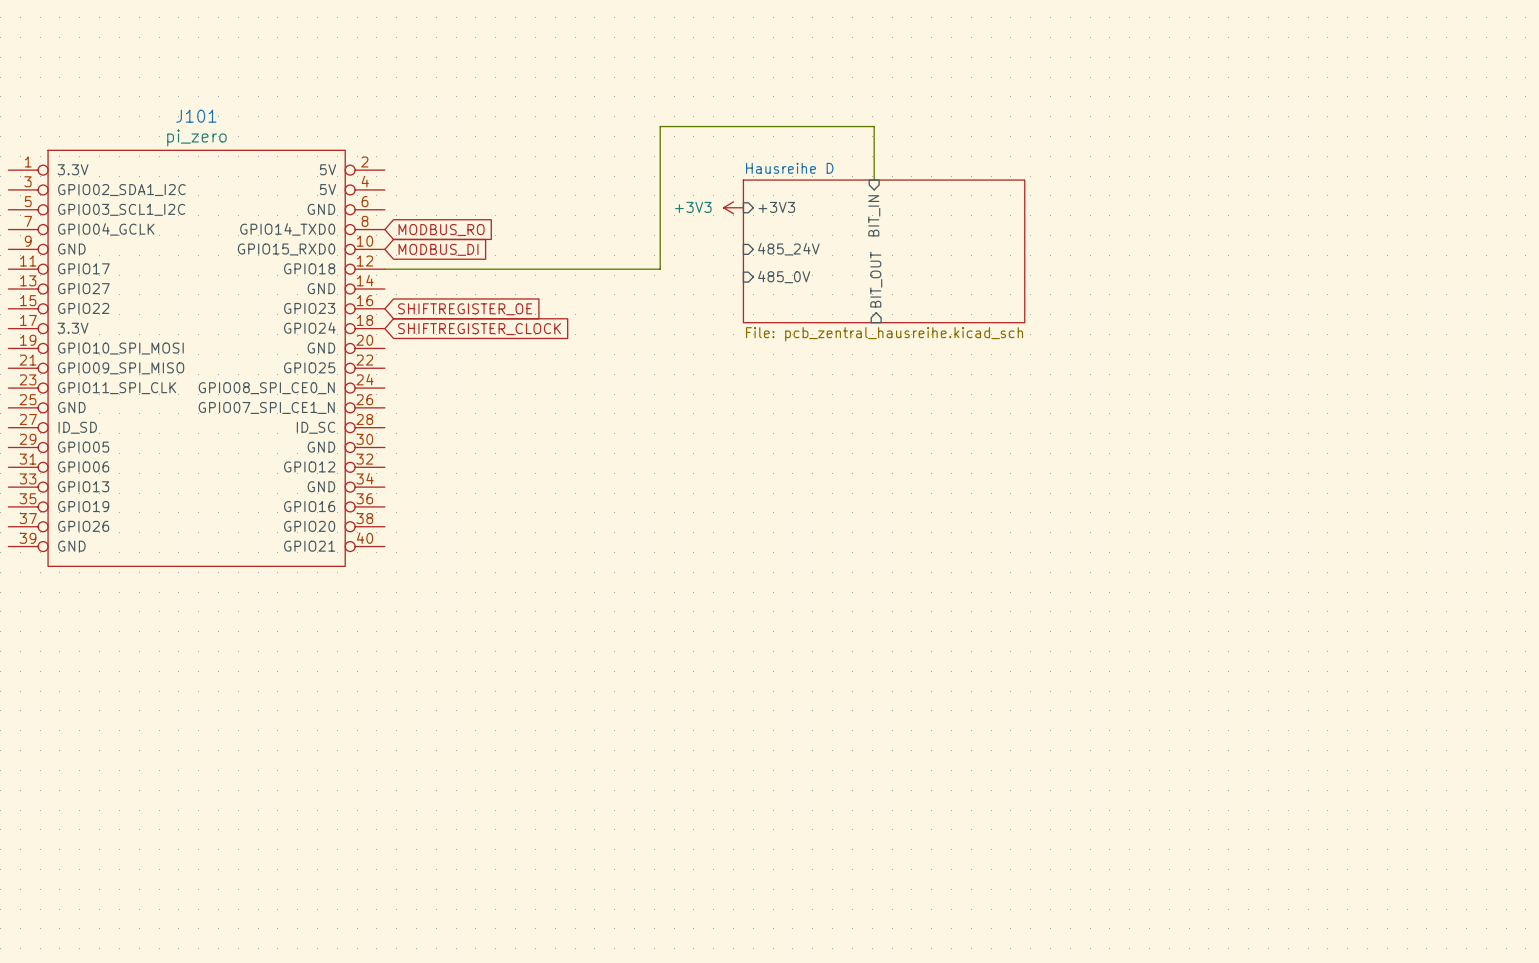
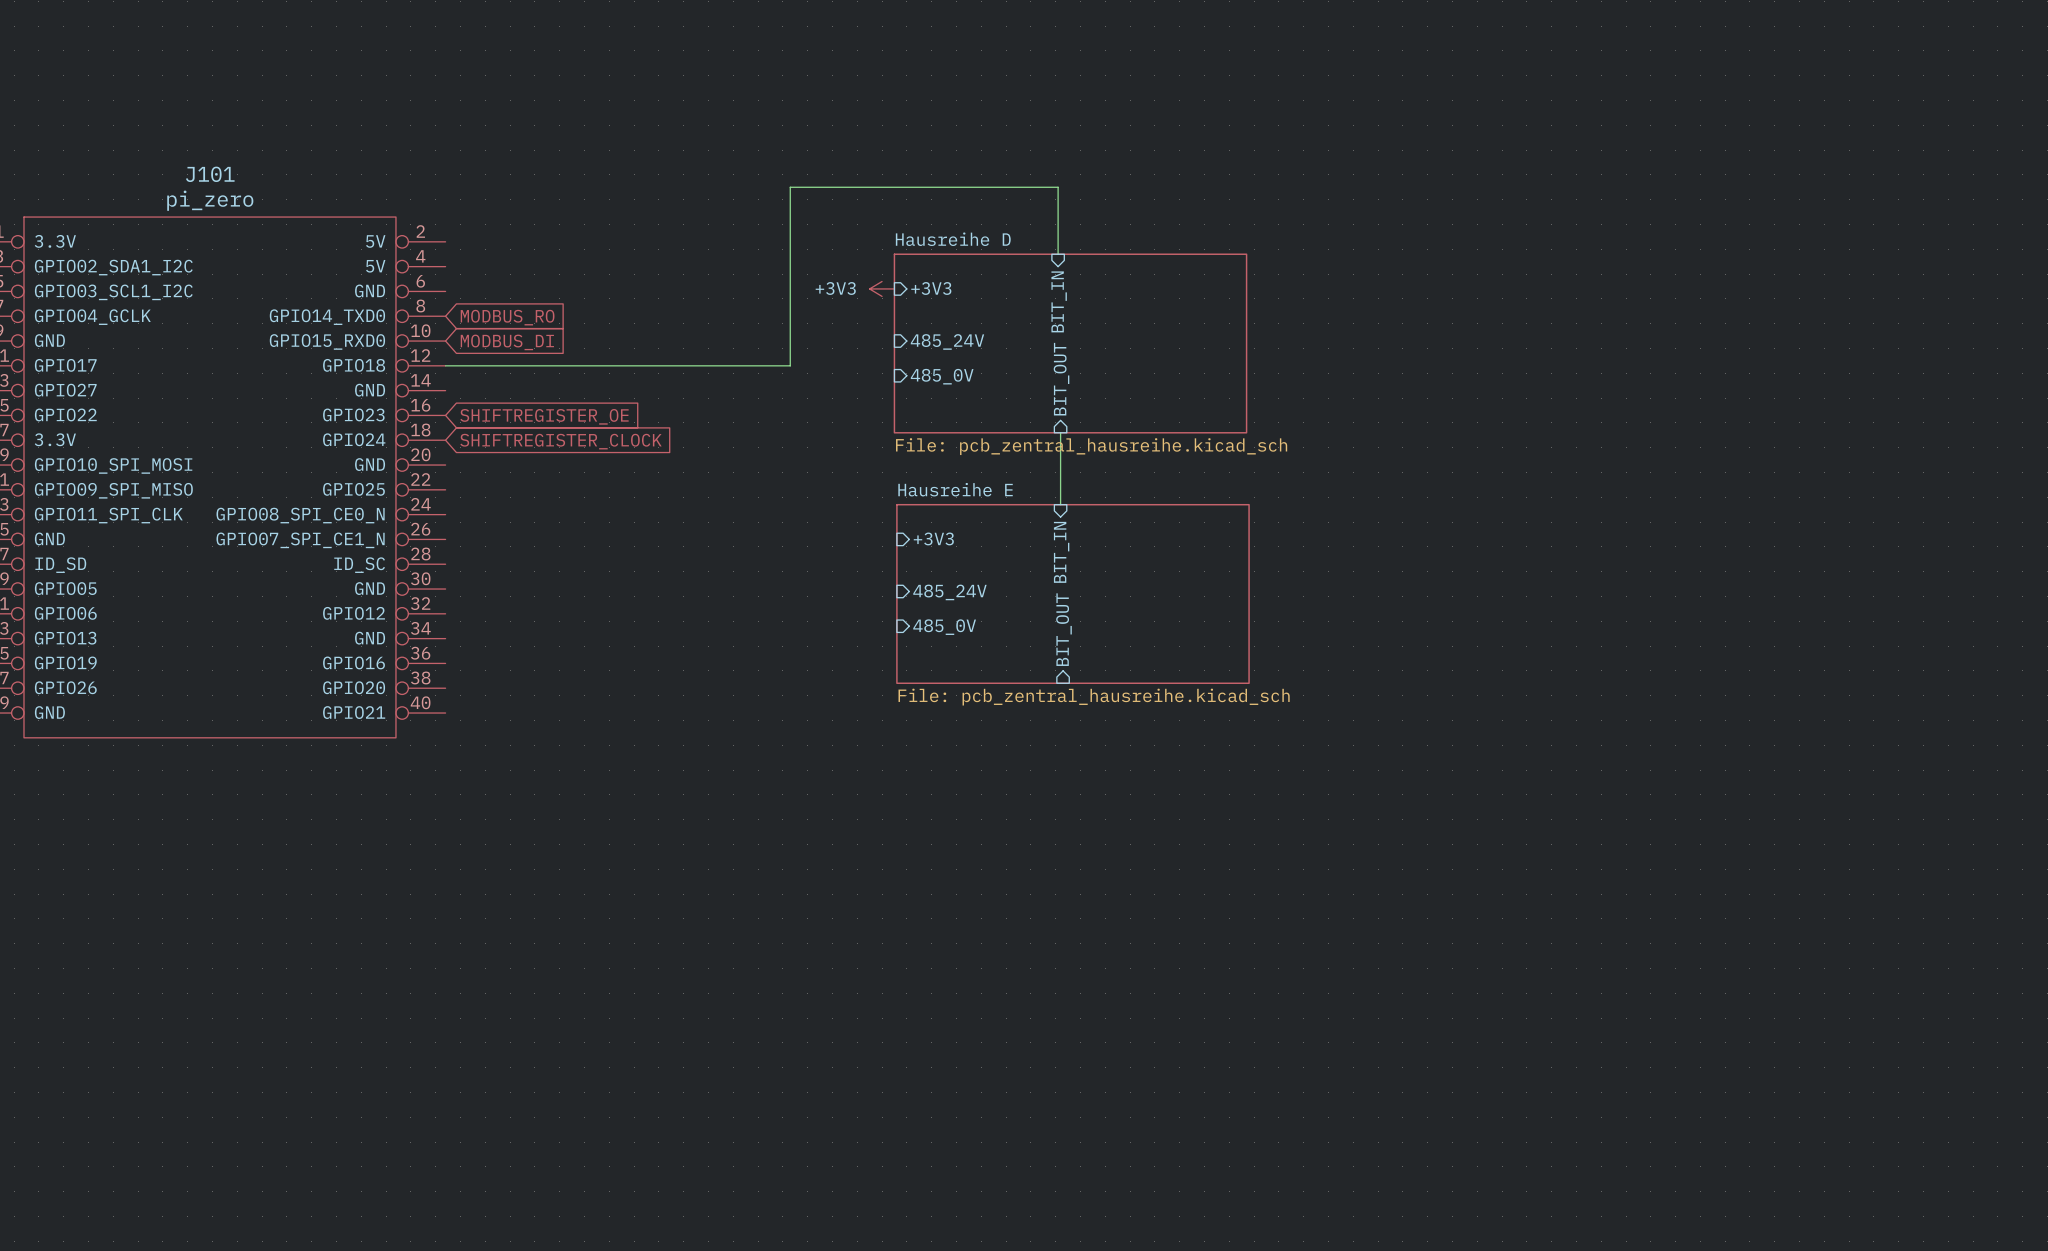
wire: none -> (1060, 432) (1060, 504)
sheet pin: none -> +3V3 (933, 538)
sheet pin: none -> BIT_IN (1061, 552)
sheet pin: none -> 485_24V (949, 592)
sheet Hausreihe E: none -> File: pcb_zentral_hausreihe.kicad_sch (1072, 593)
sheet pin: none -> 485_0V (944, 627)
sheet pin: none -> BIT_OUT (1063, 629)

